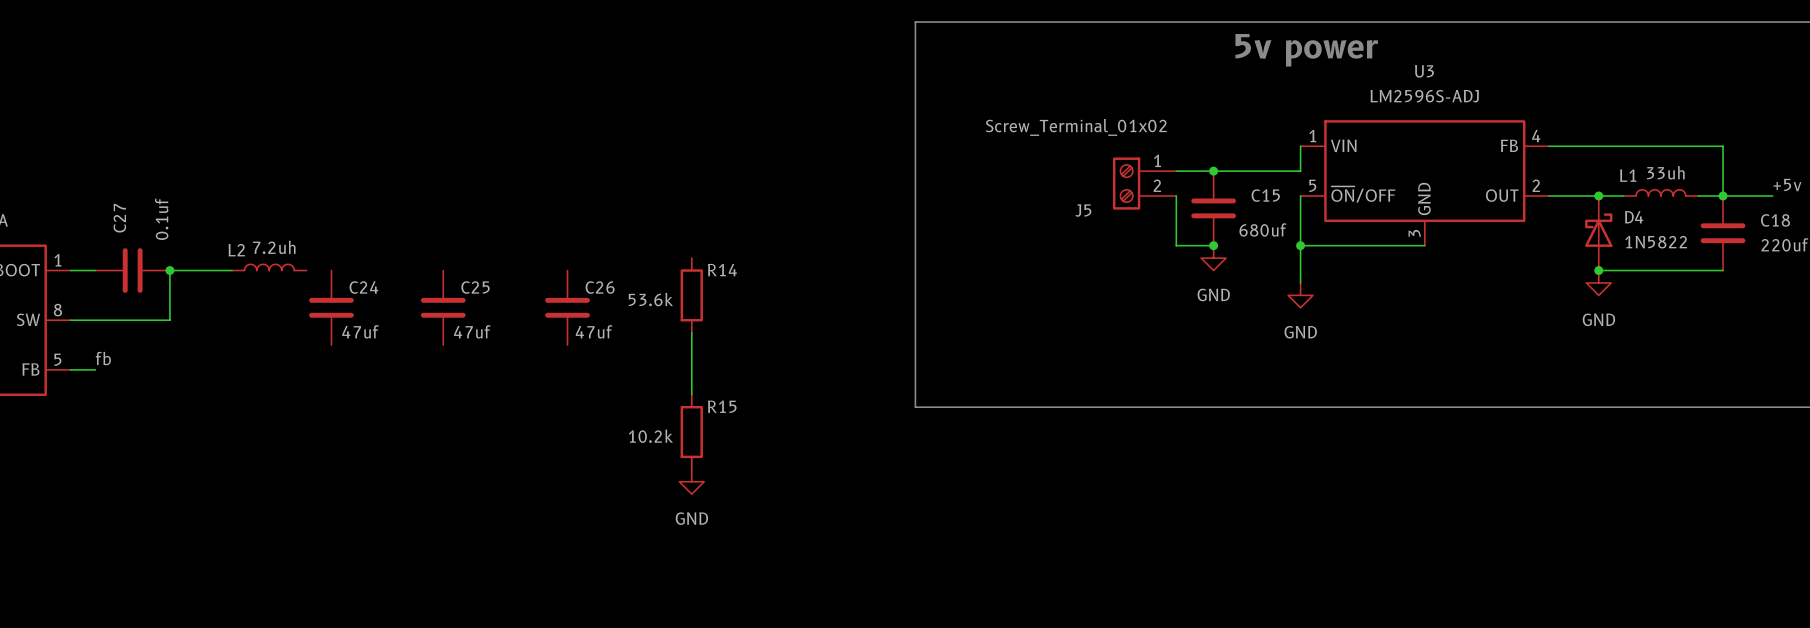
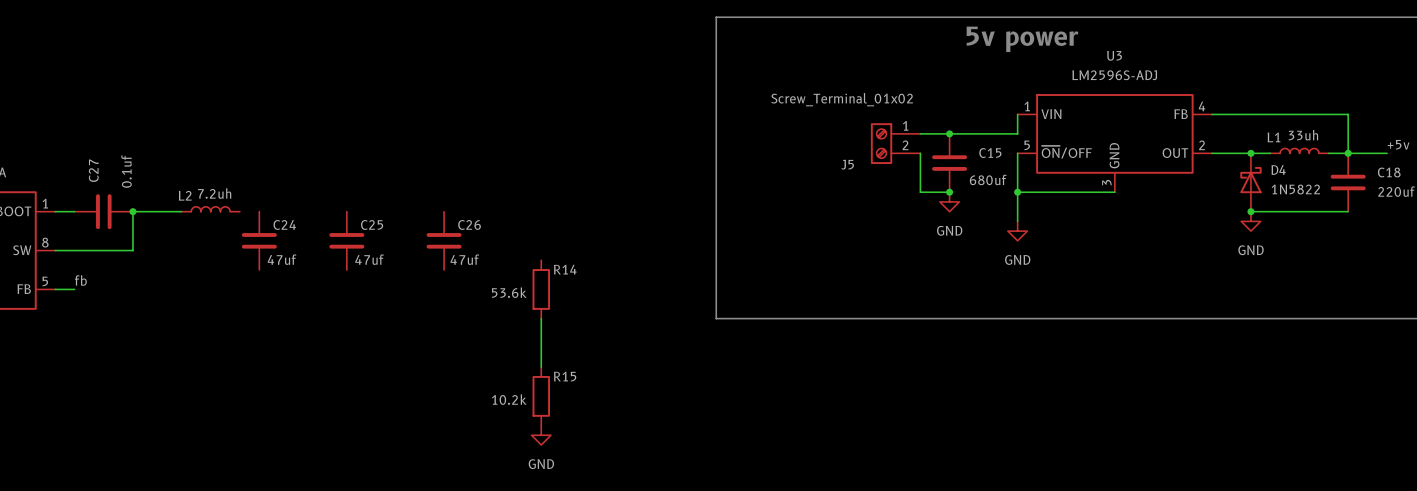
R14 position: (691, 295) -> (541, 289)
wire: (691, 332) (691, 394) -> (541, 318) (541, 367)
R15 position: (691, 432) -> (541, 396)
power symbol position: GND (691, 481) -> GND (541, 435)

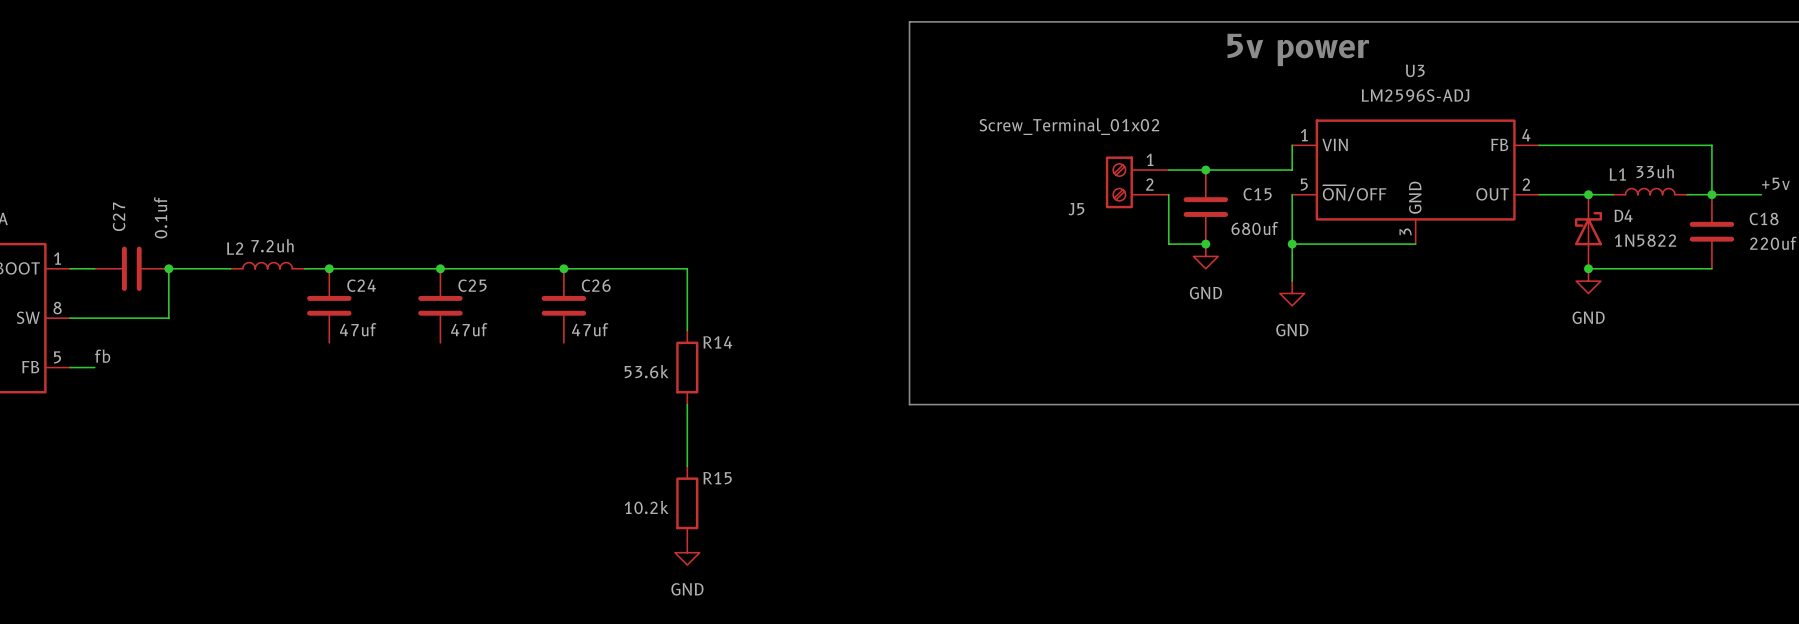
wire: none -> (304, 268) (687, 268) (687, 330)
junction: none -> (329, 268)
junction: none -> (440, 268)
junction: none -> (563, 268)

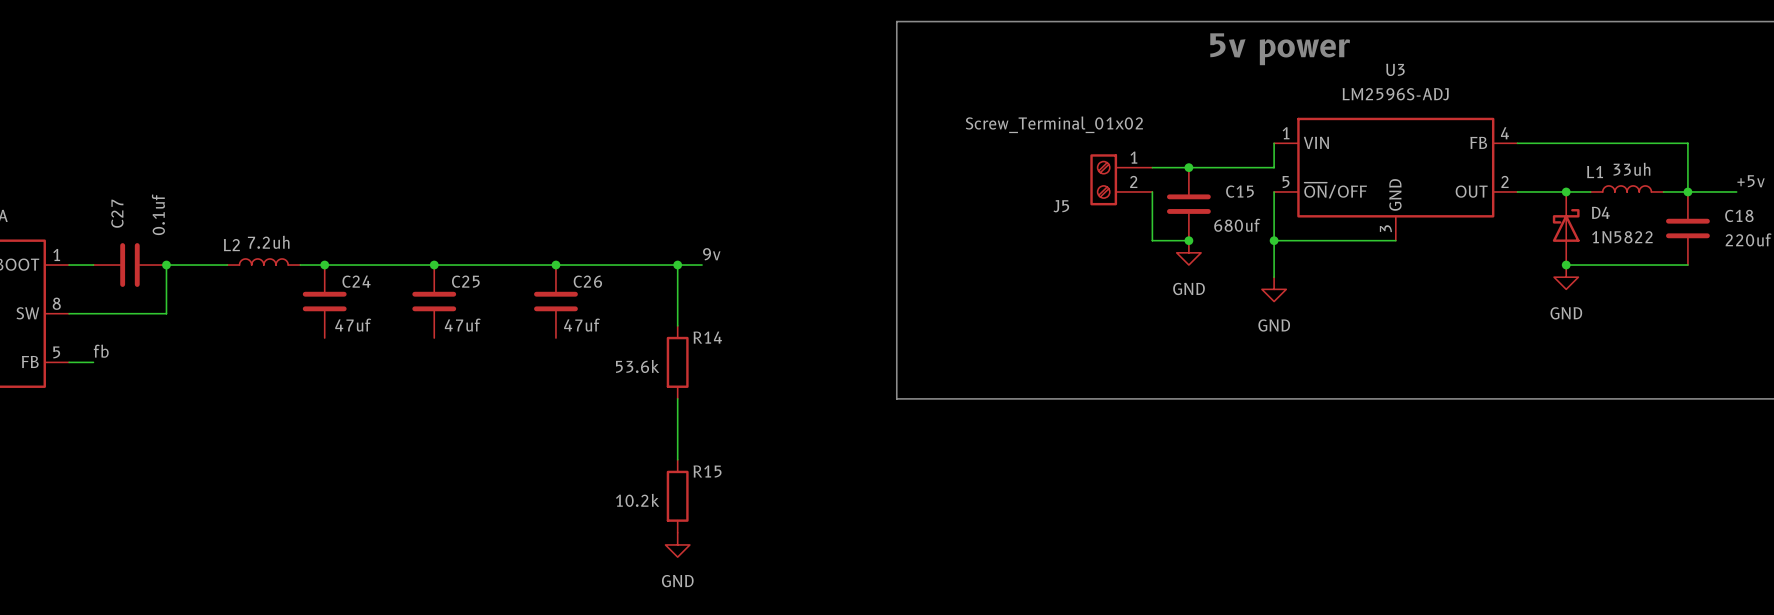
label: none -> 9v (711, 254)
wire: none -> (677, 265) (702, 265)
junction: none -> (677, 265)

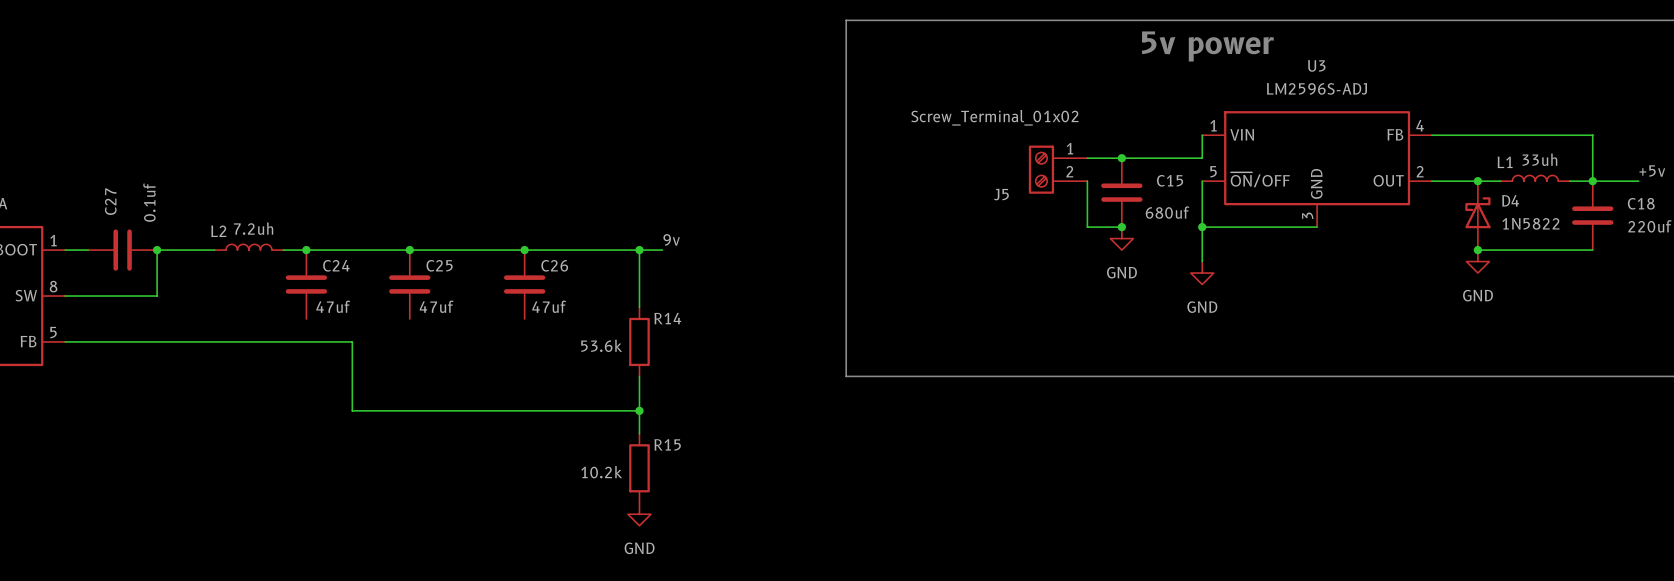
label: fb (101, 351) -> none
wire: none -> (88, 341) (352, 341) (352, 410) (639, 410)
junction: none -> (639, 410)

